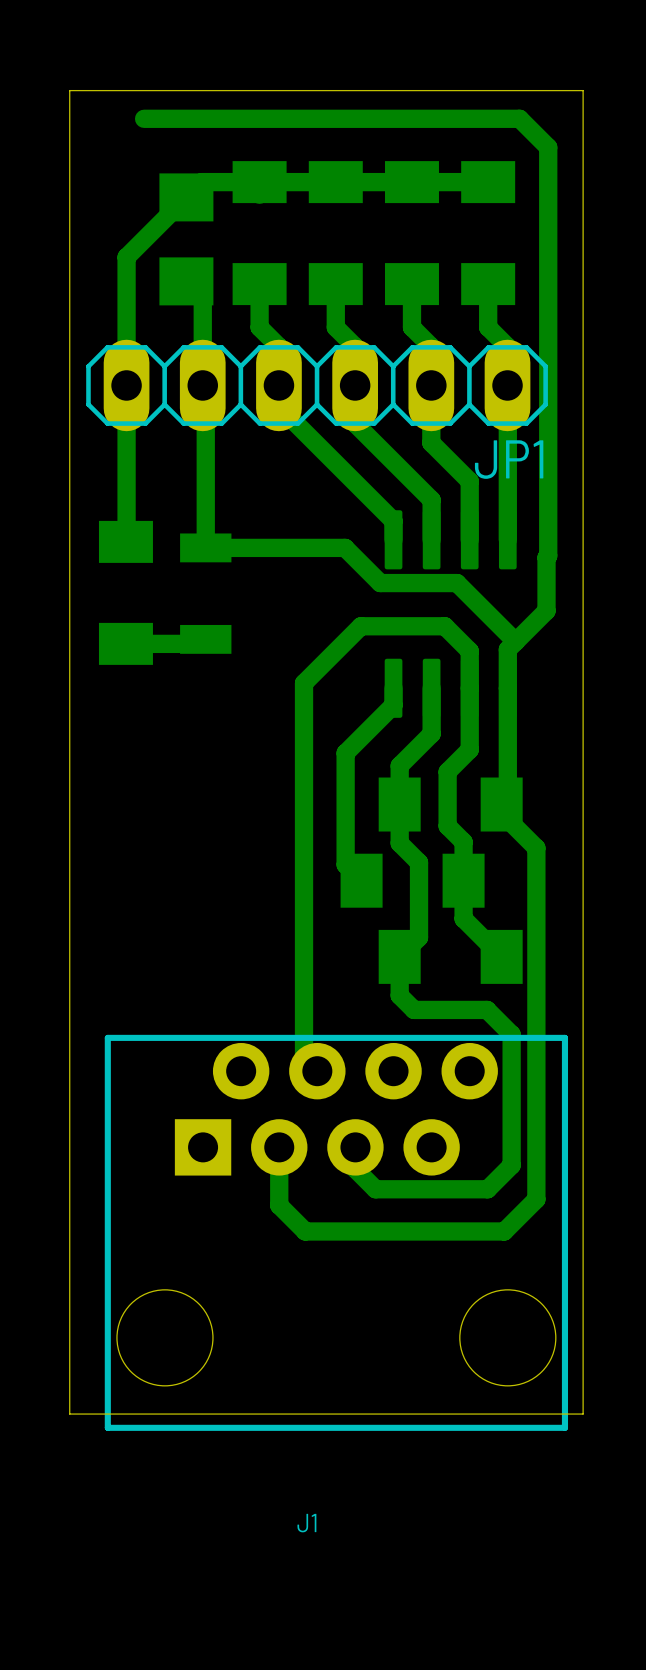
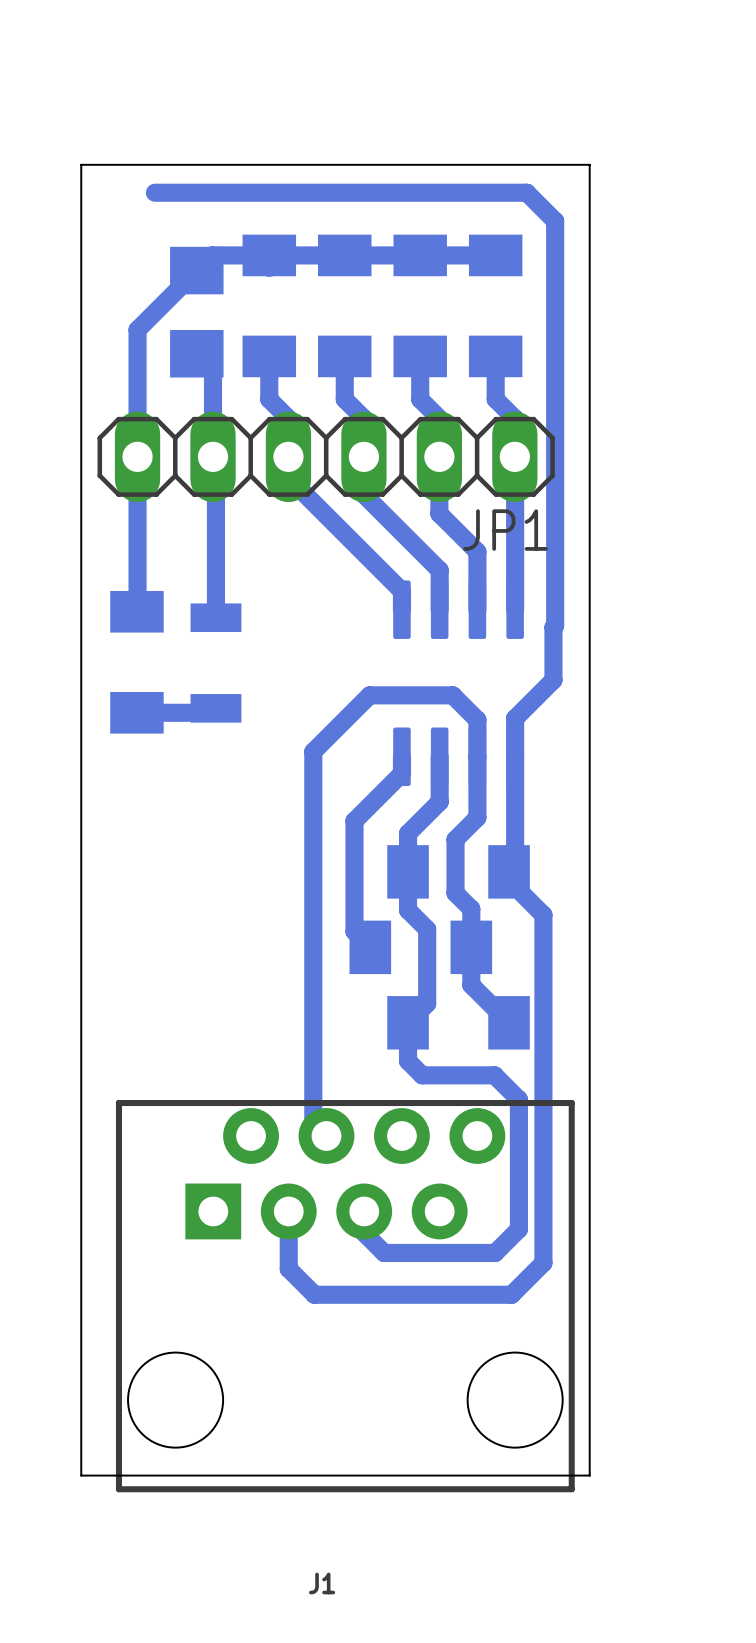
bottom track: (205, 547) (345, 547) (380, 583) (457, 583) (515, 641) -> none

